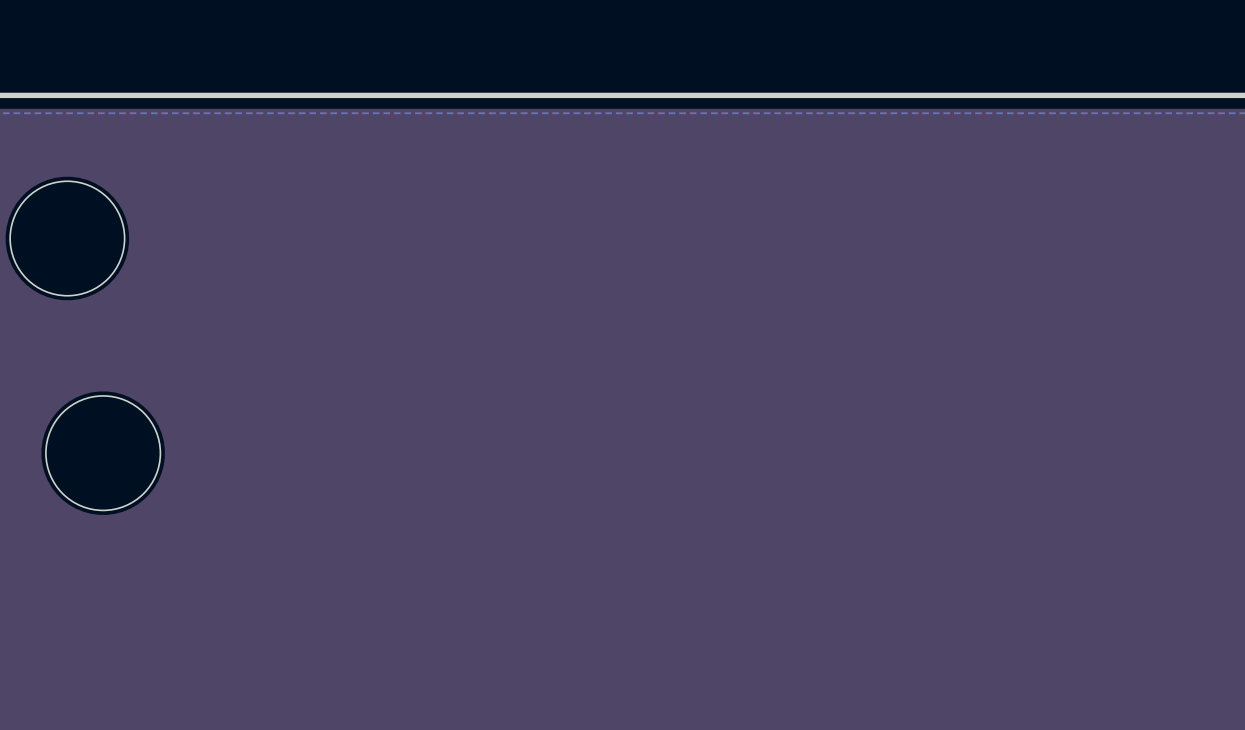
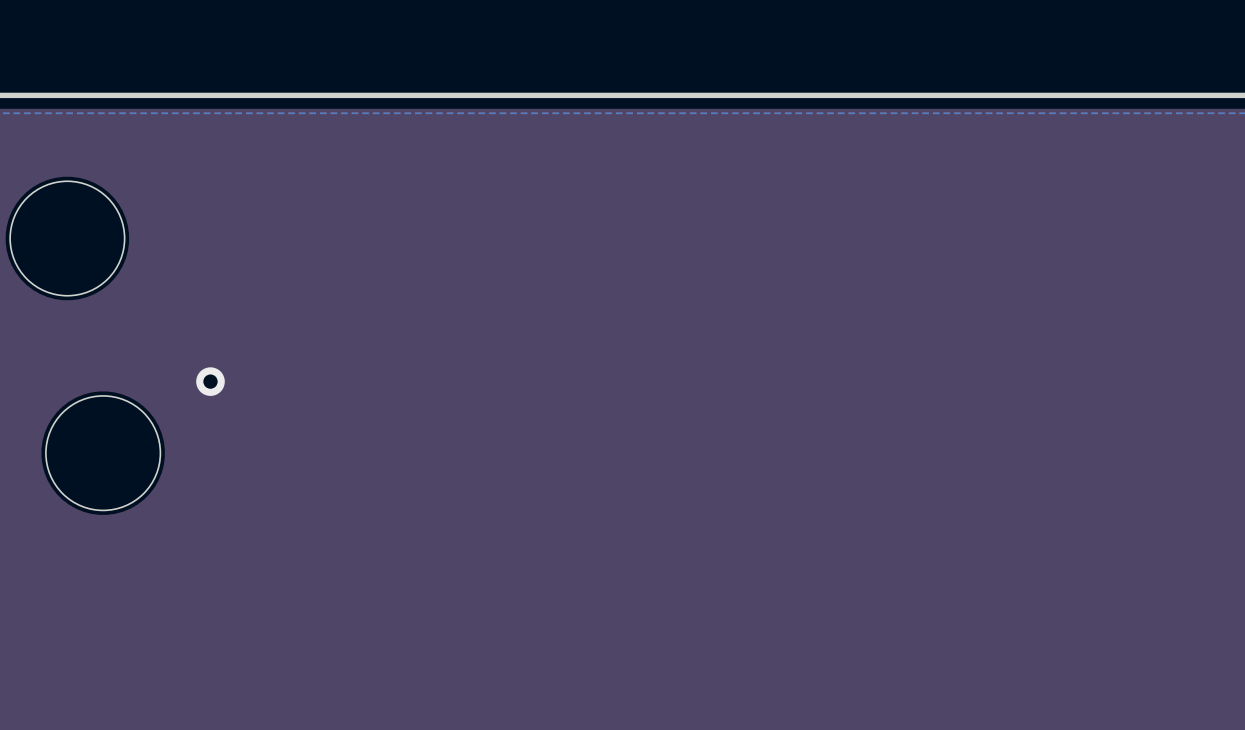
via: none -> (210, 381)

